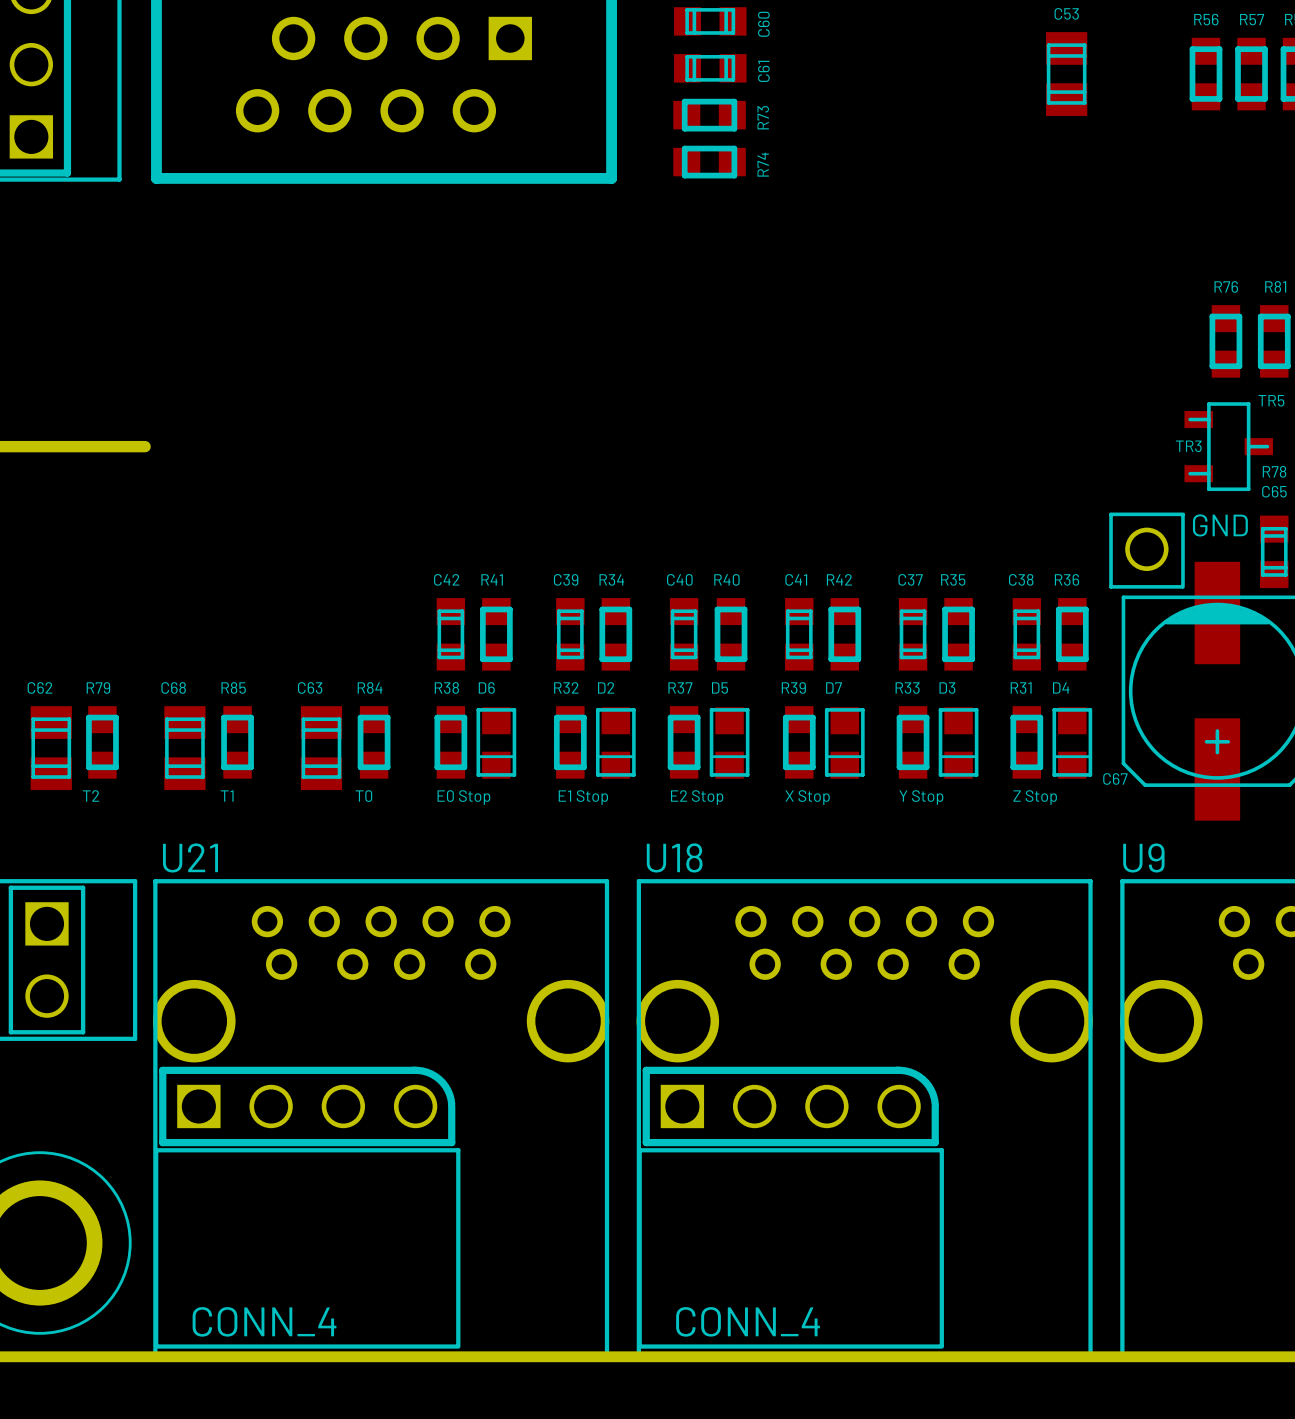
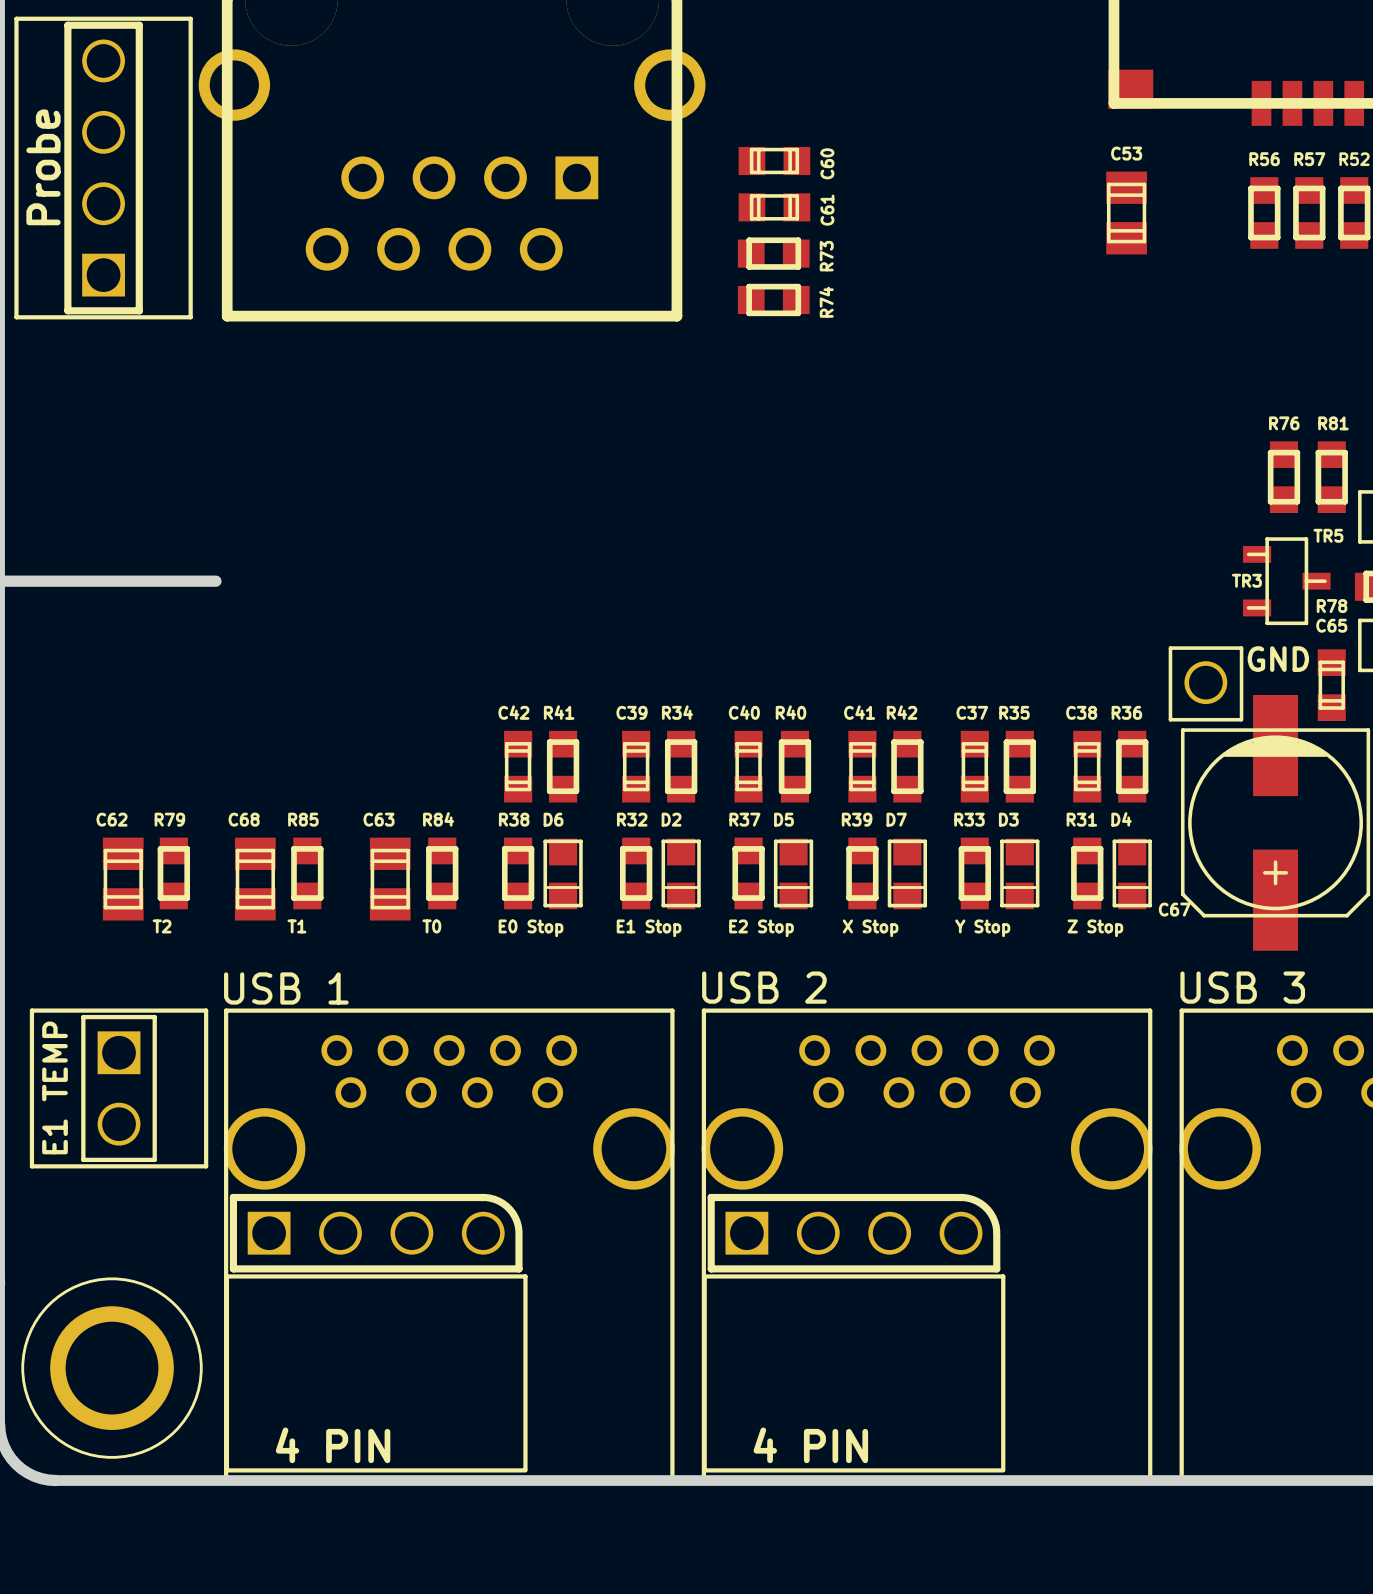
U21 name: U21 (190, 857) -> USB 1 (286, 988)
U18 name: U18 (674, 857) -> USB 2 (764, 987)
U9 name: U9 (1143, 857) -> USB 3 (1242, 987)
part value: CONN_4 (264, 1321) -> 4 PIN (333, 1445)
part value: CONN_4 (748, 1321) -> 4 PIN (810, 1445)

